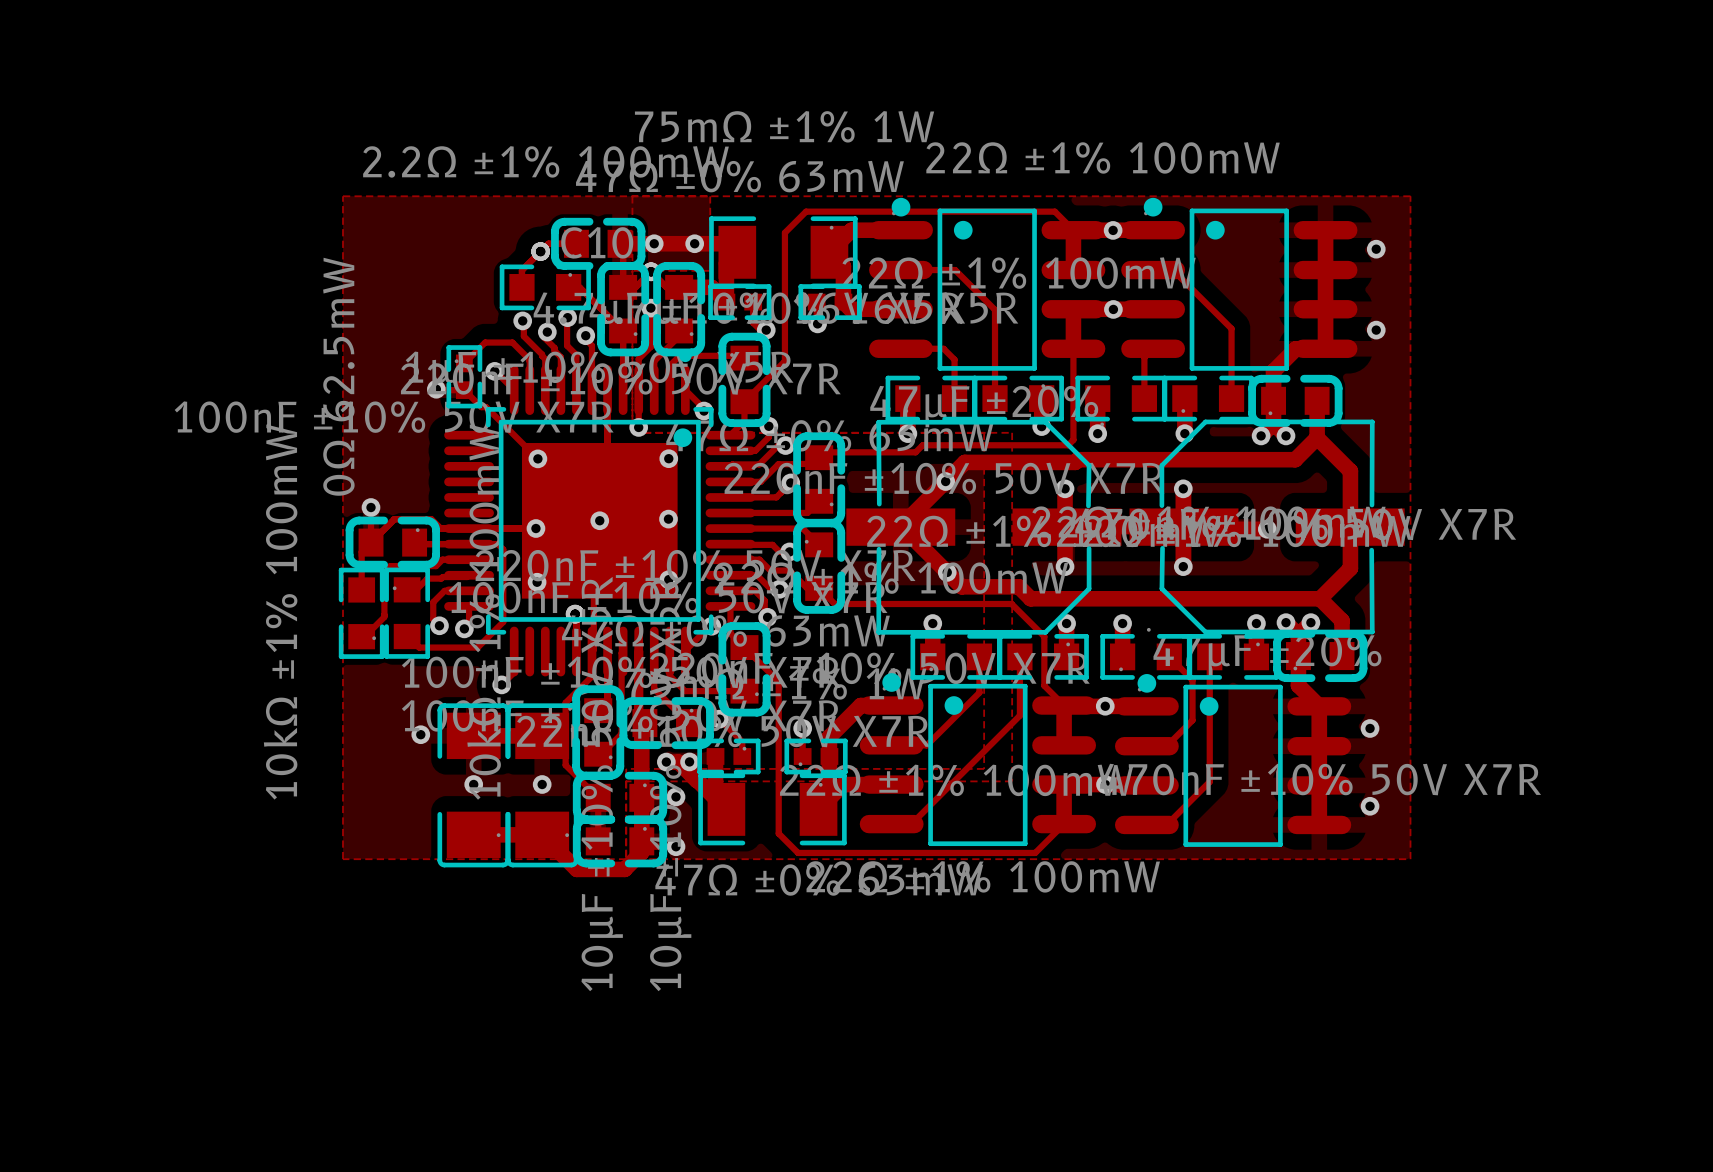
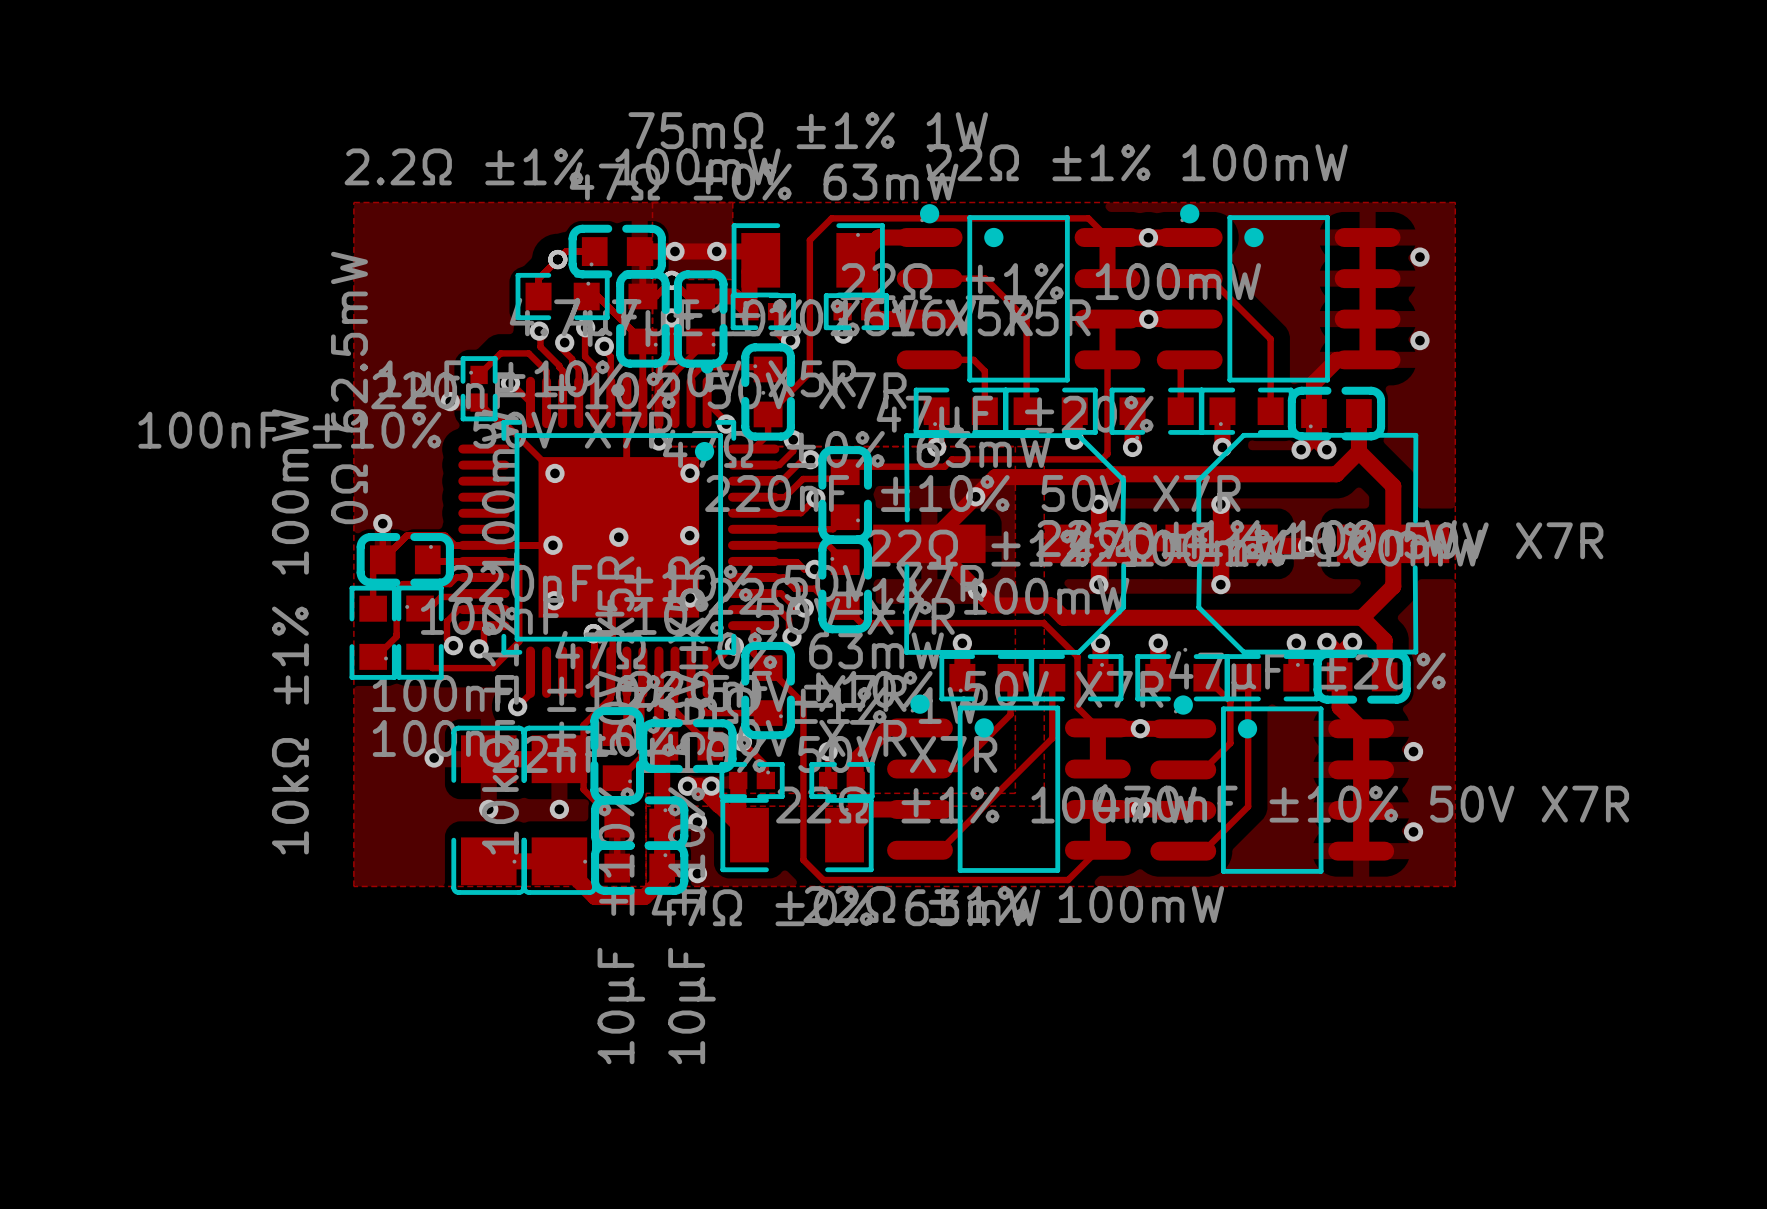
C10 name: C10 (597, 242) -> none

